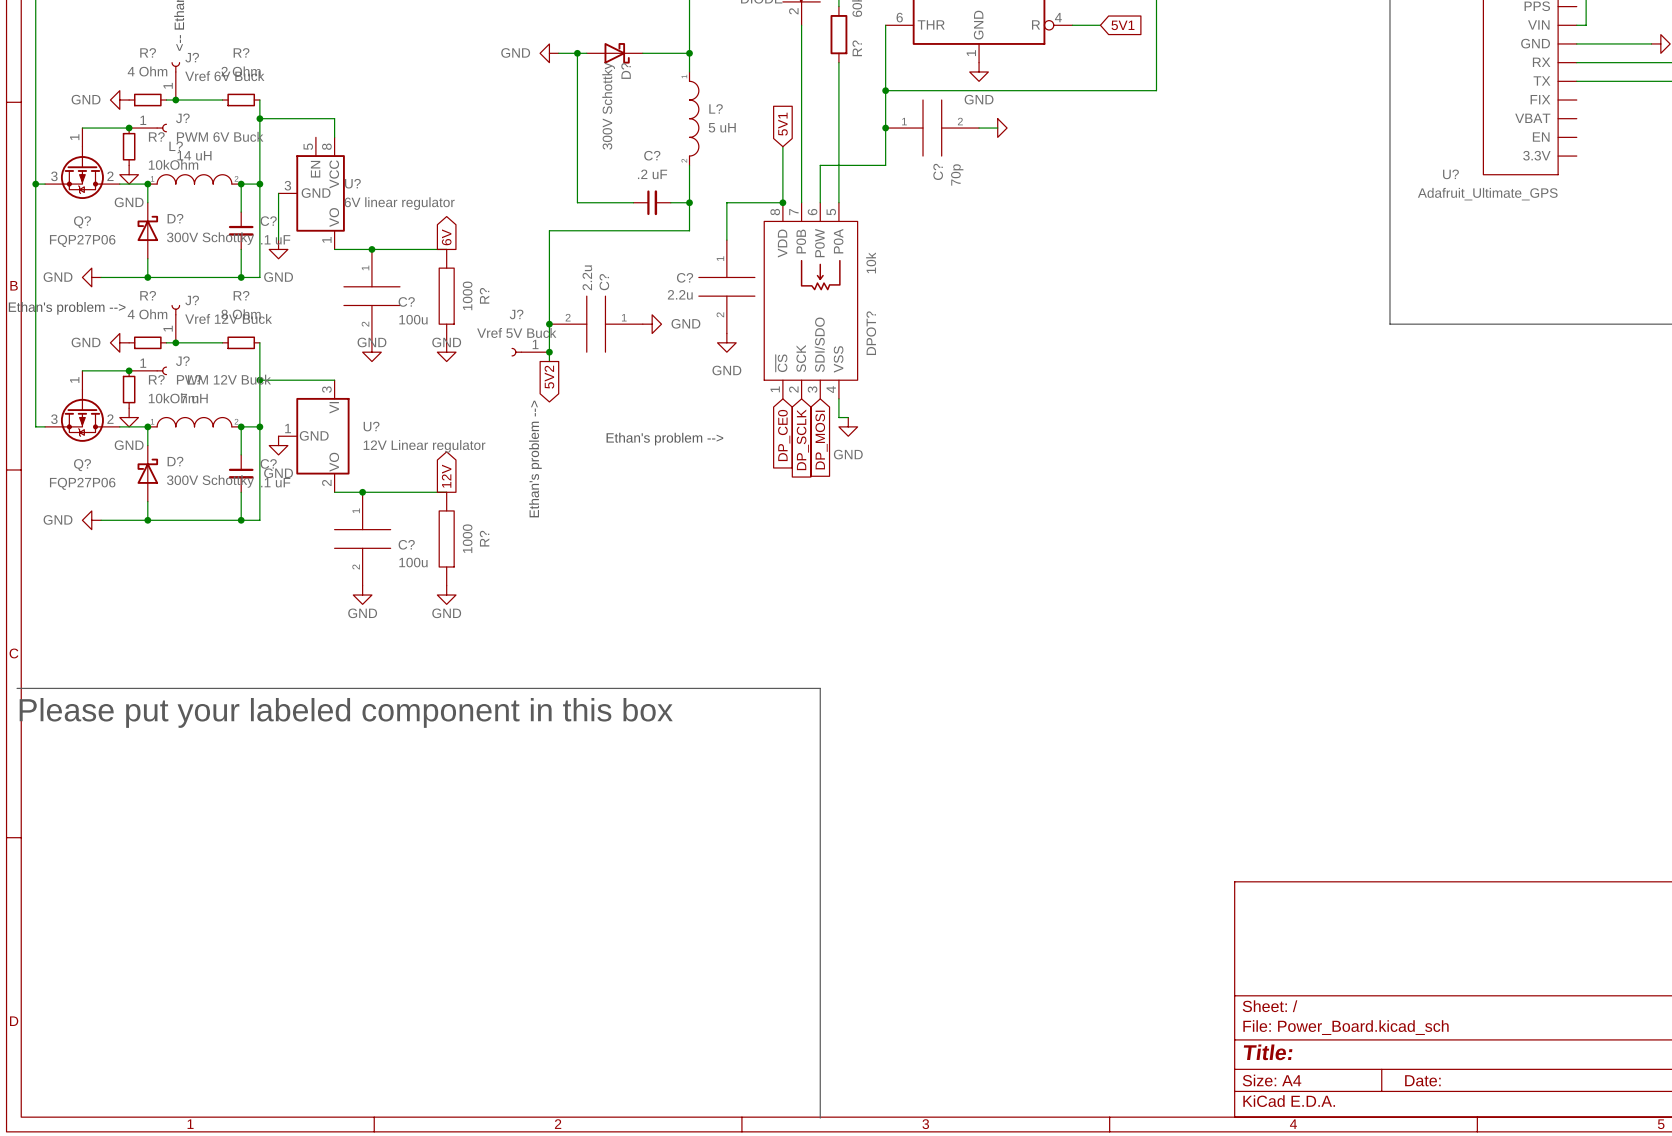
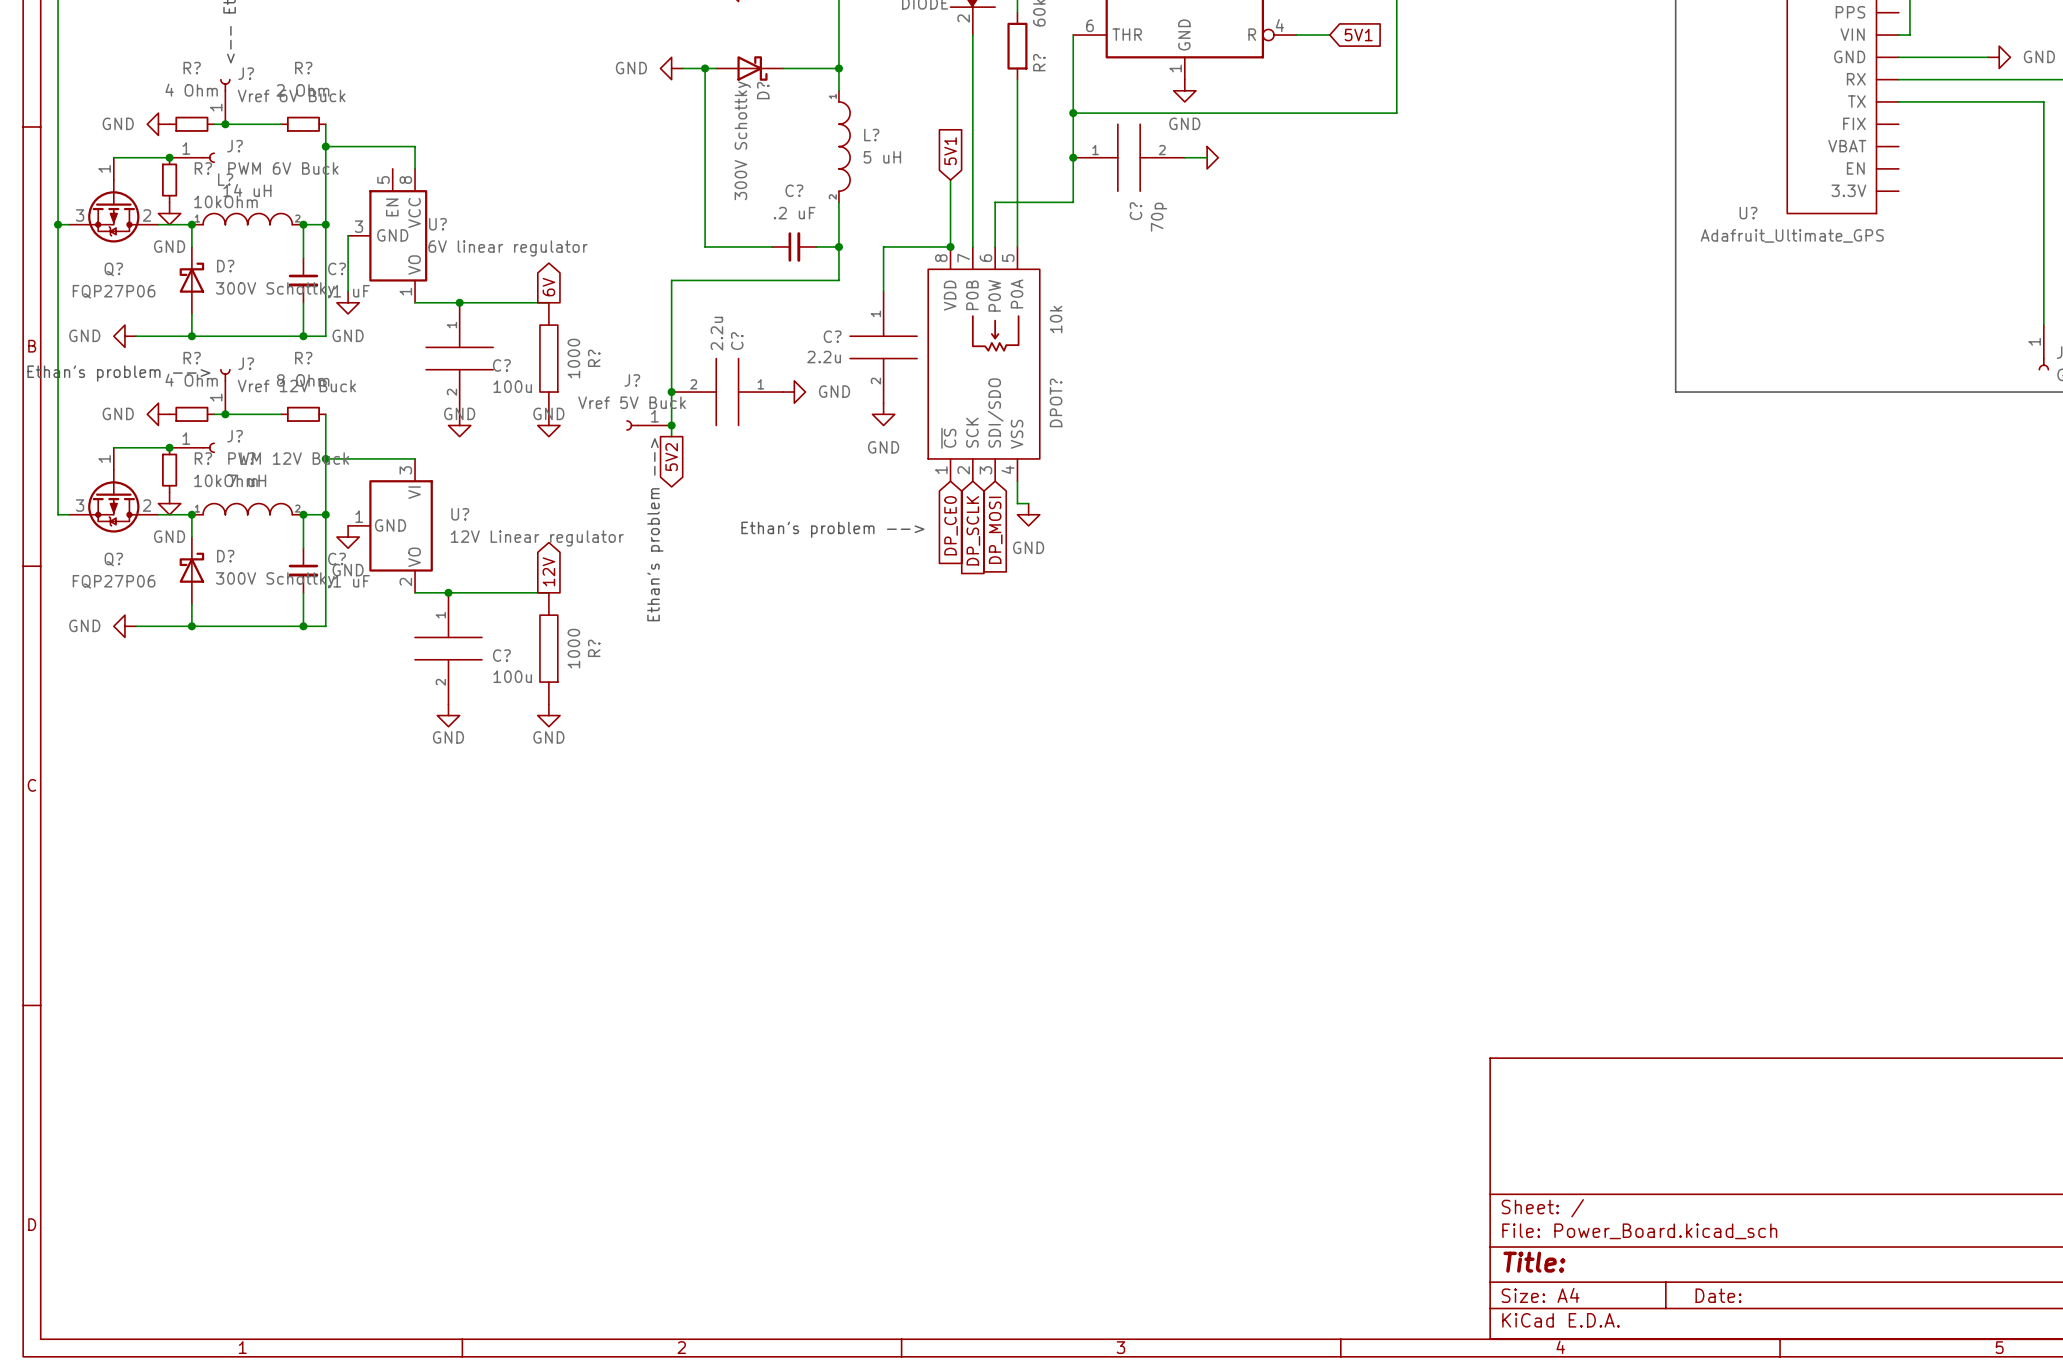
line: (17, 688) (820, 688) (820, 1118) -> none
text: Please put your labeled component in this box (346, 712) -> none

